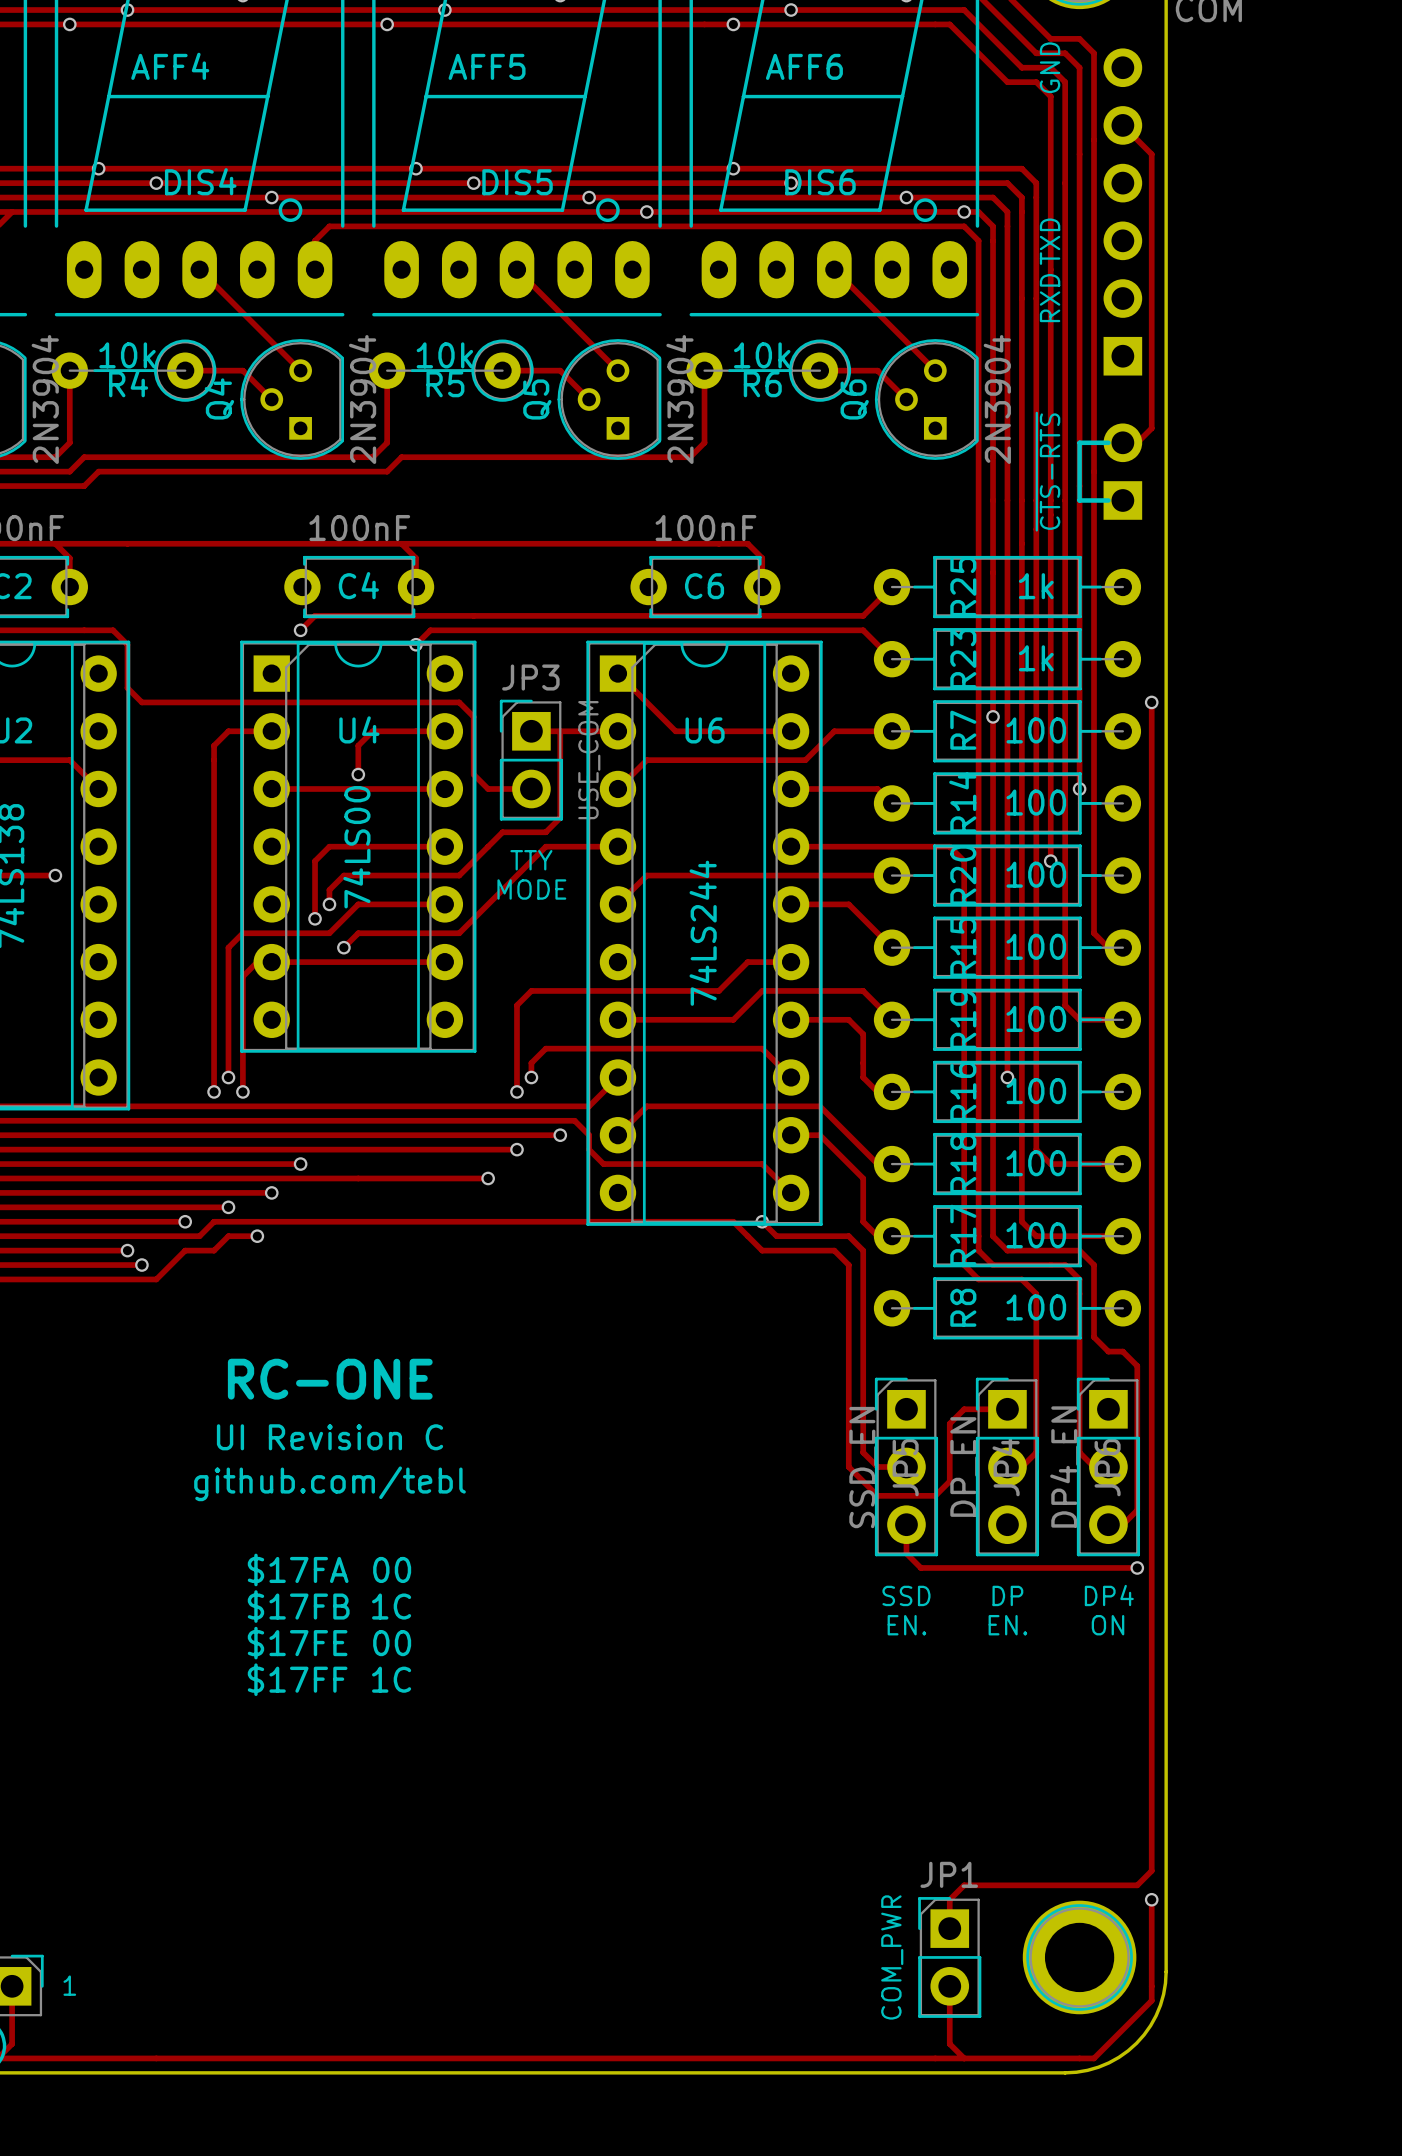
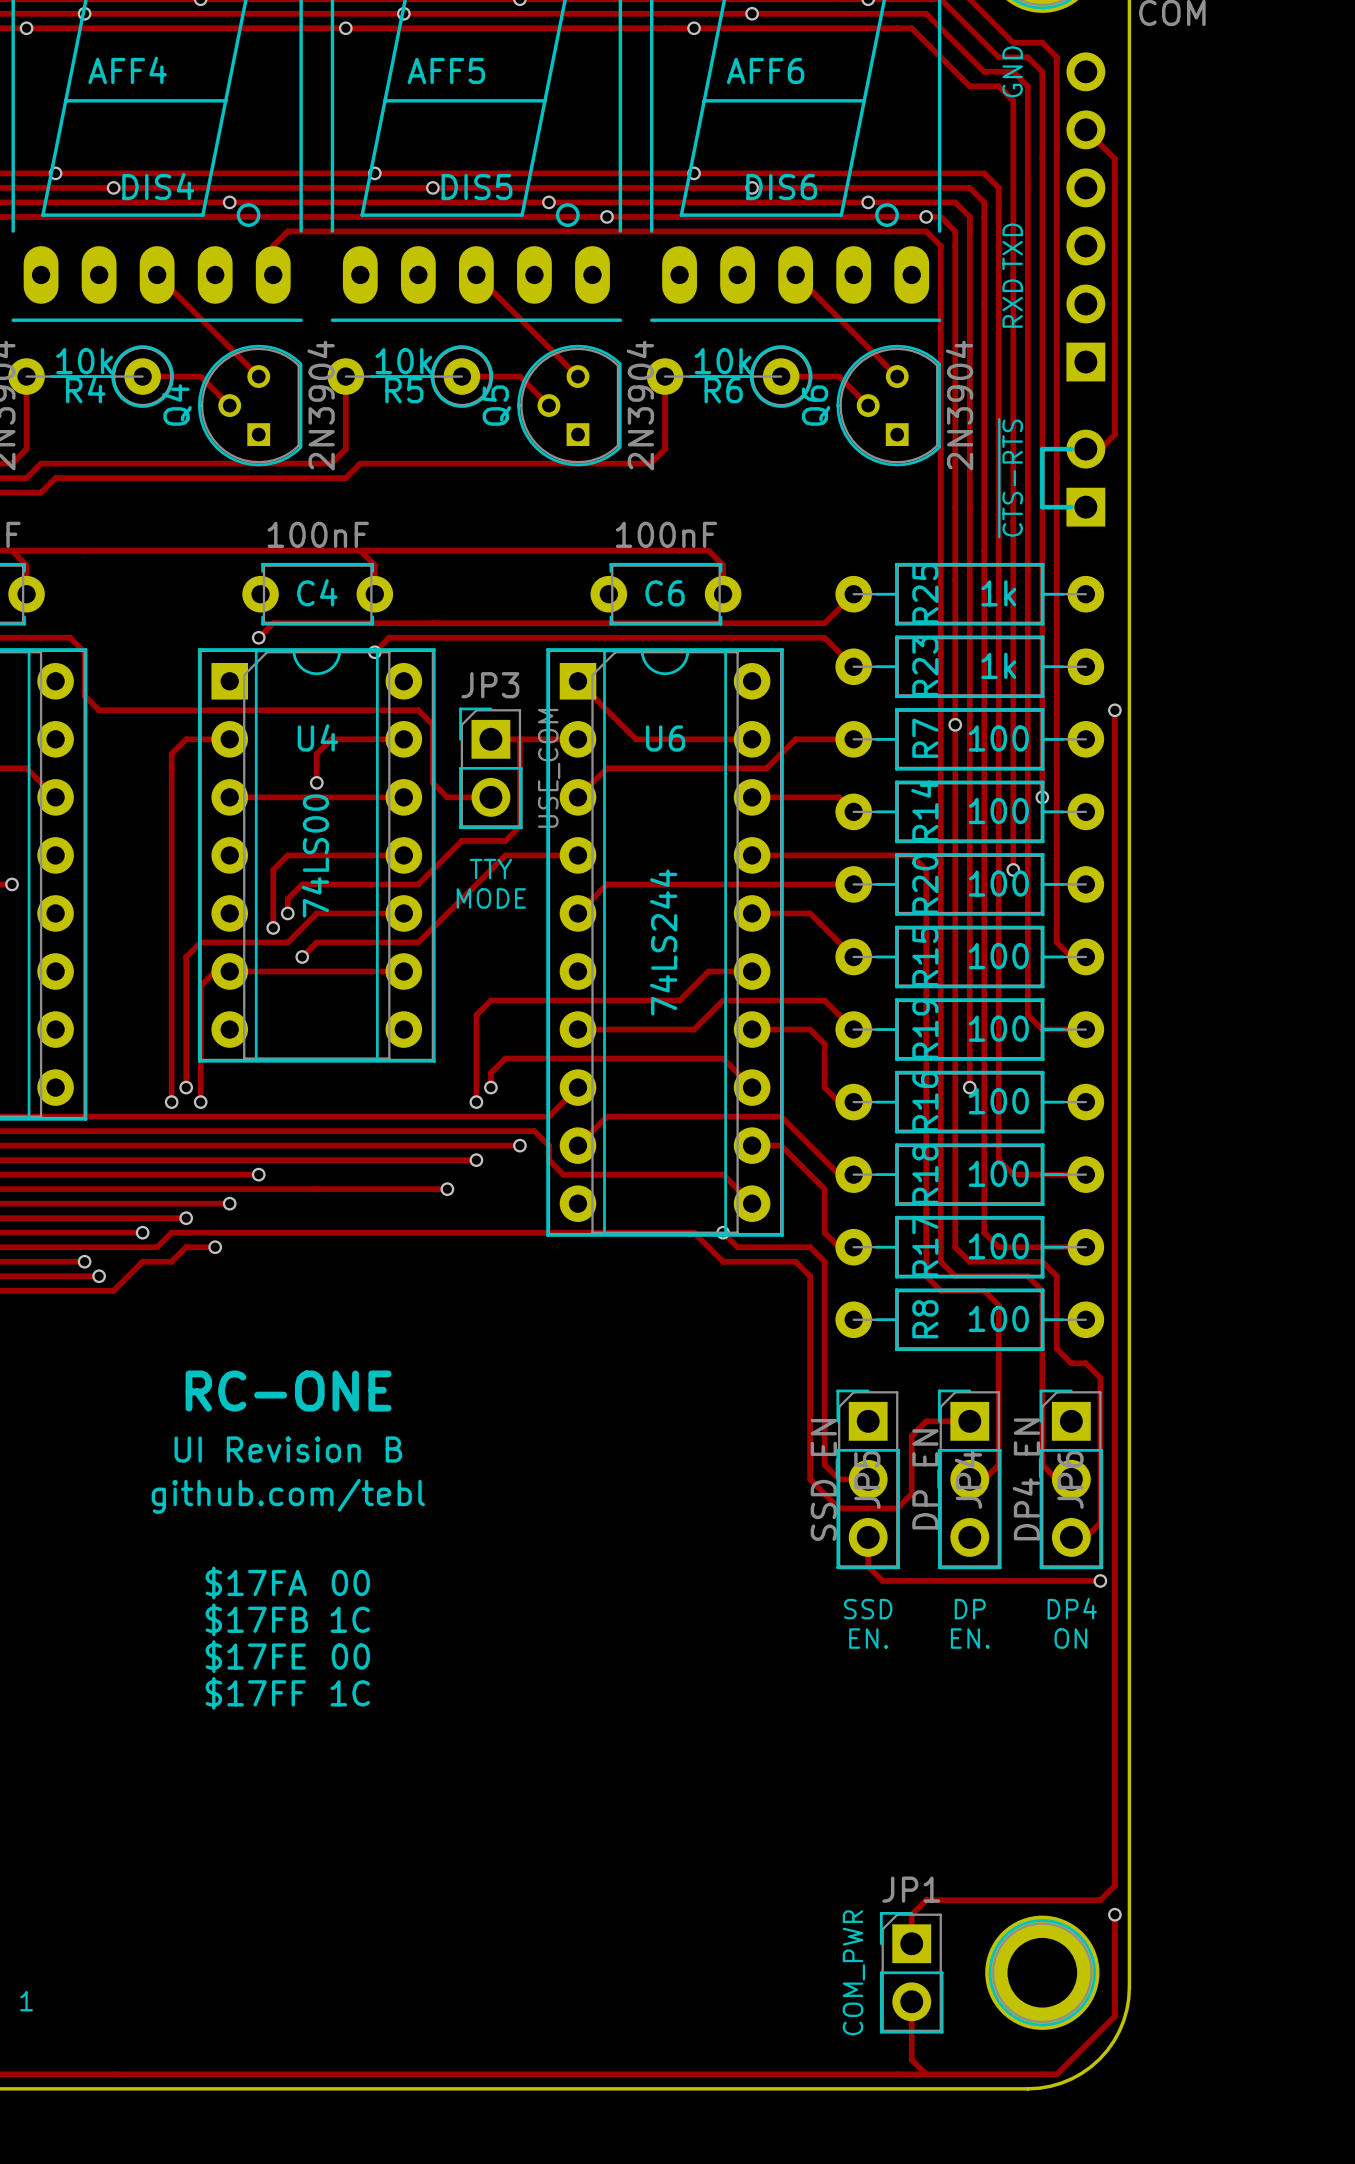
text: UI Revision C (330, 1437) -> UI Revision B (288, 1449)

